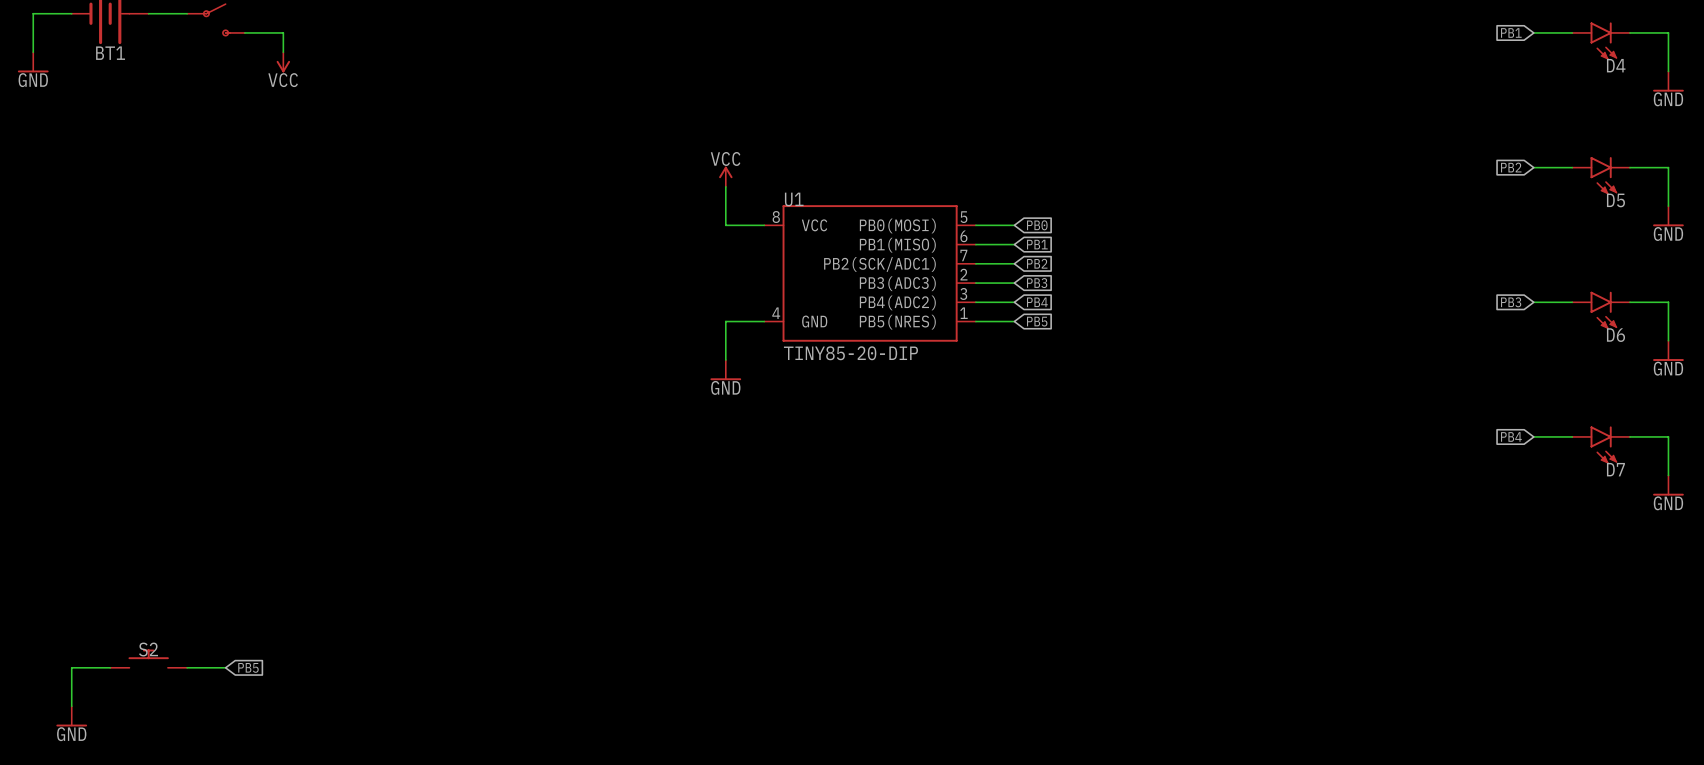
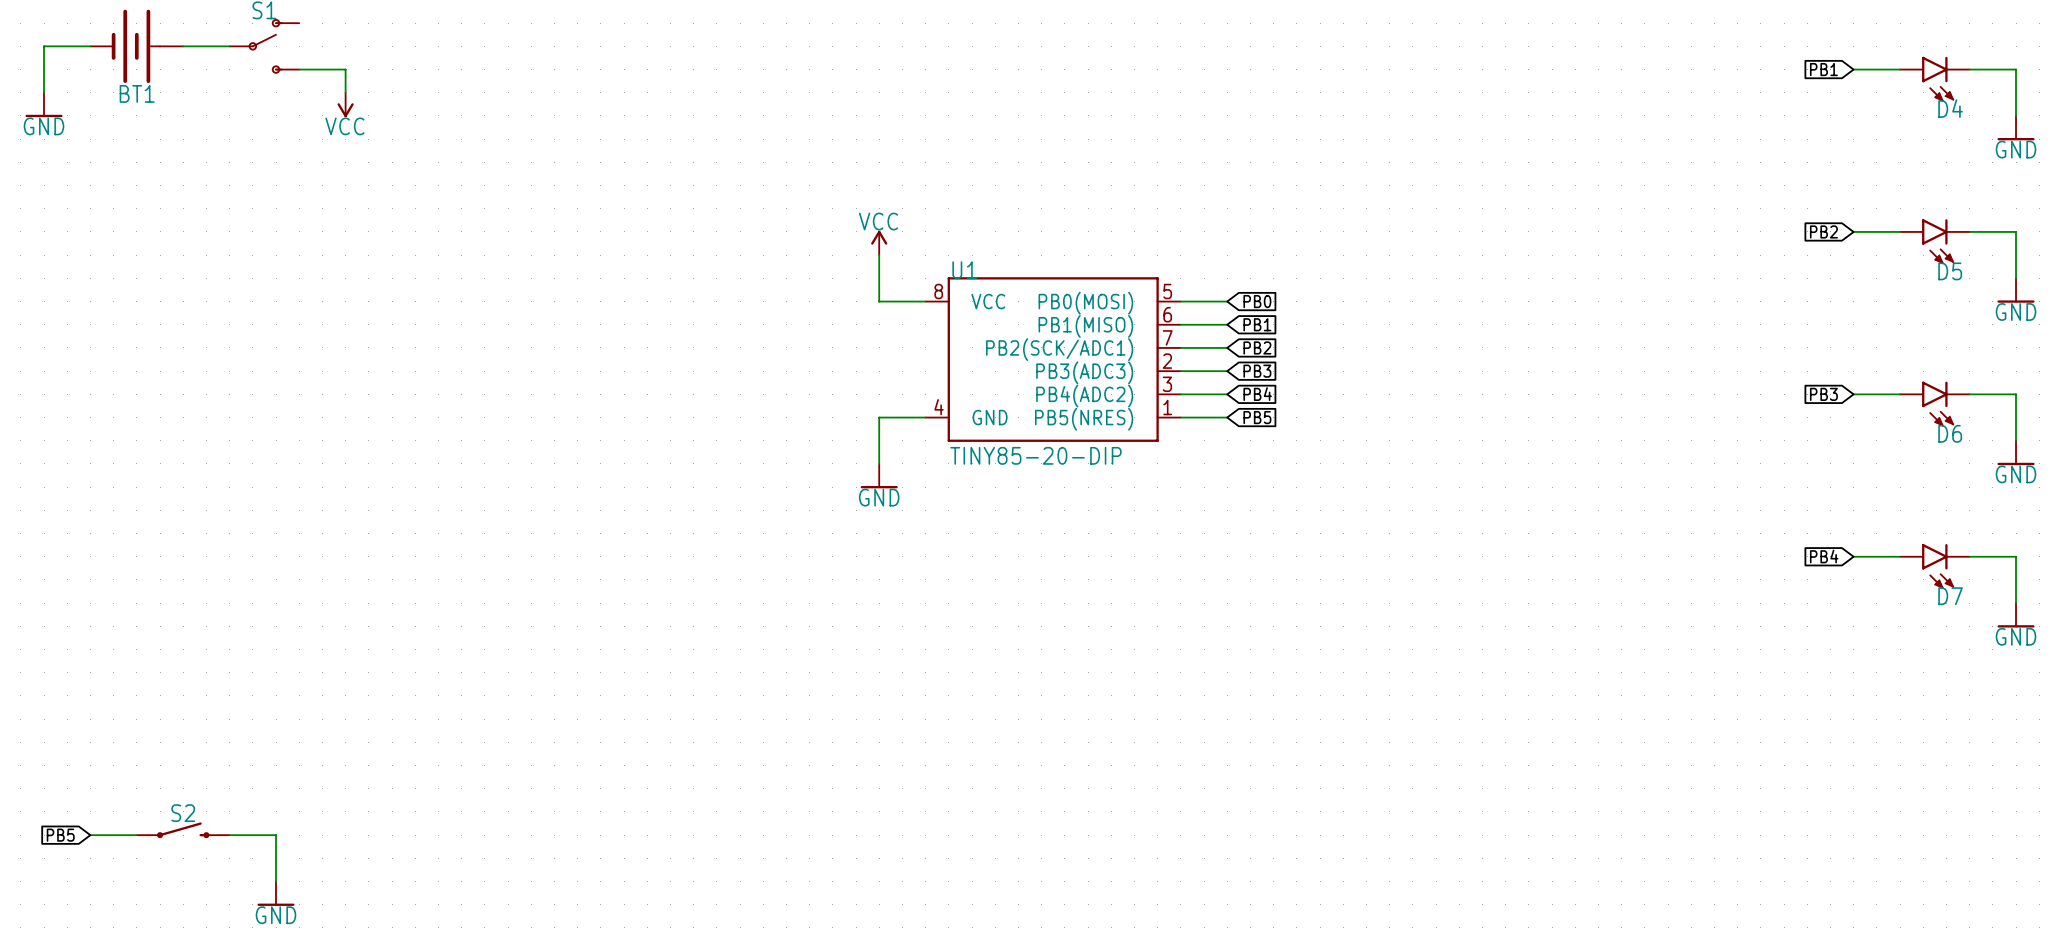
S2 symbol: [110, 649, 188, 668] -> [136, 822, 230, 839]
wire: (71, 667) (71, 706) -> (276, 835) (276, 881)
global label rotation: 0° (248, 667) -> 180° (60, 835)
global label position: PB5 (248, 667) -> PB5 (60, 835)
power symbol position: GND (71, 716) -> GND (276, 893)

